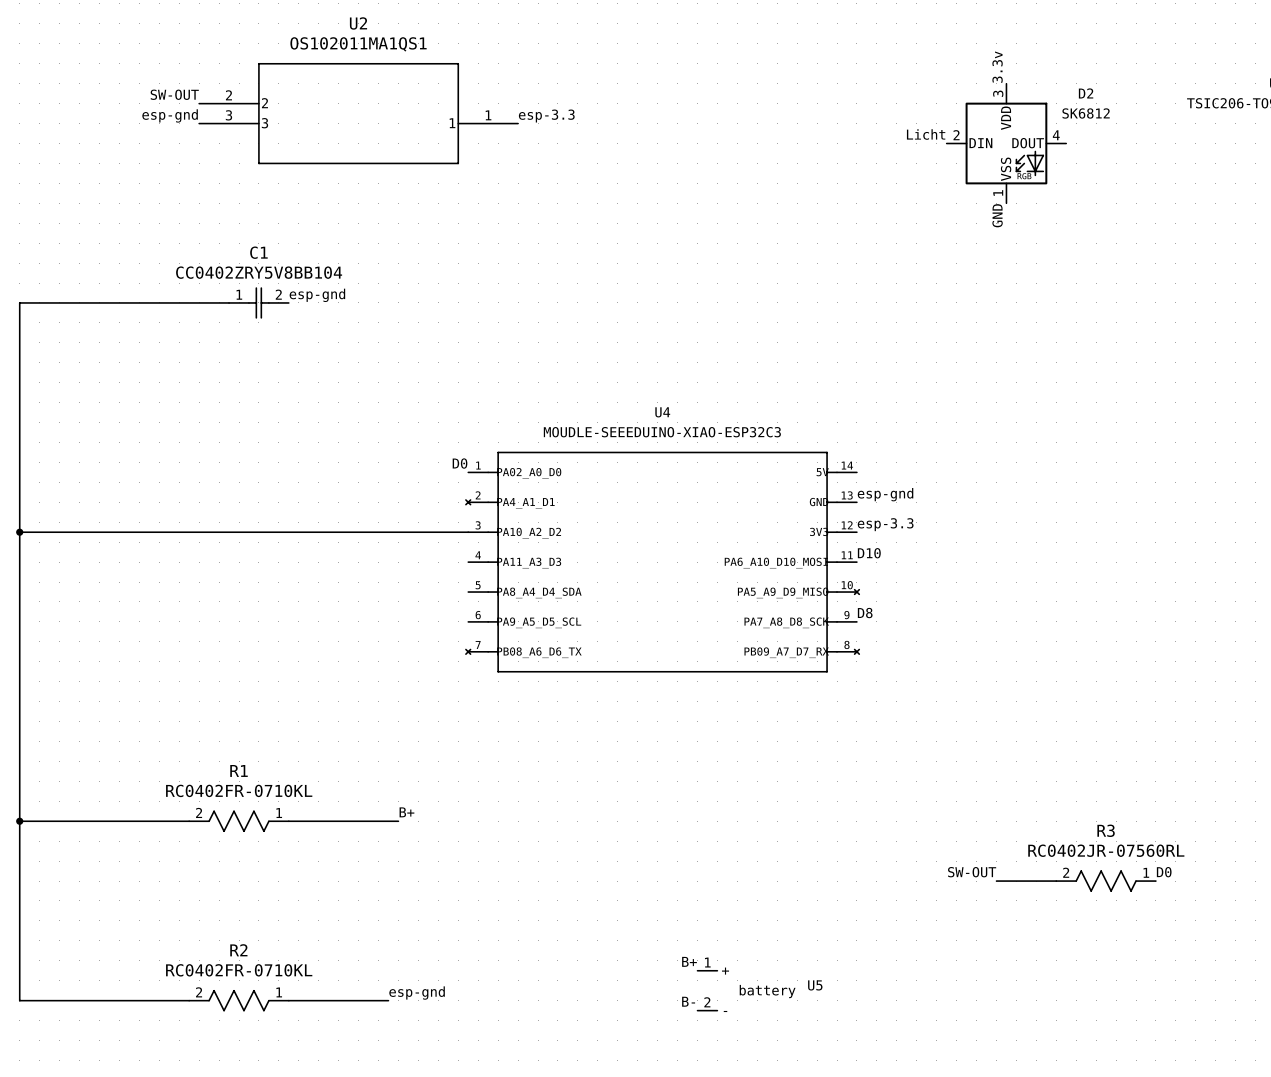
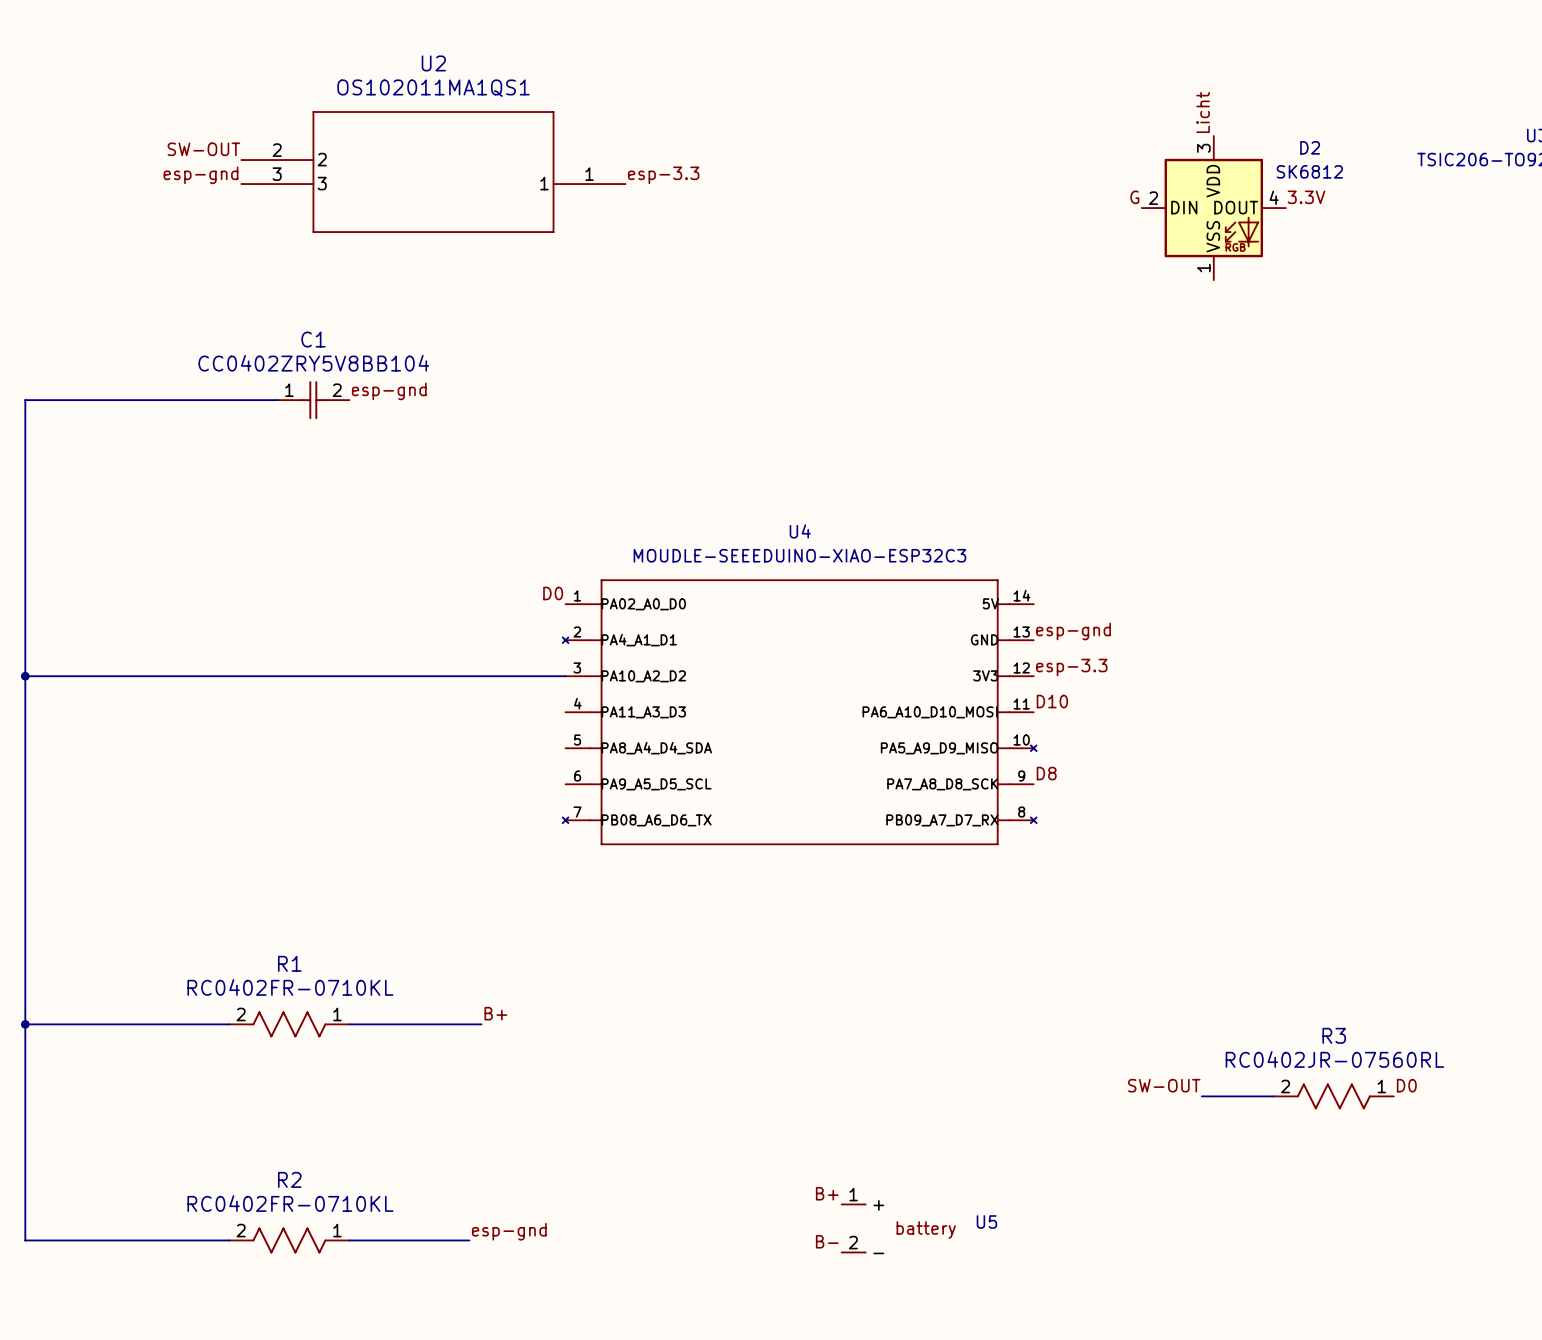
label: 3.3v (997, 67) -> Licht (1203, 112)
label: Licht (926, 134) -> G (1134, 197)
label: none -> 3.3V (1306, 197)
label: GND (997, 215) -> none

